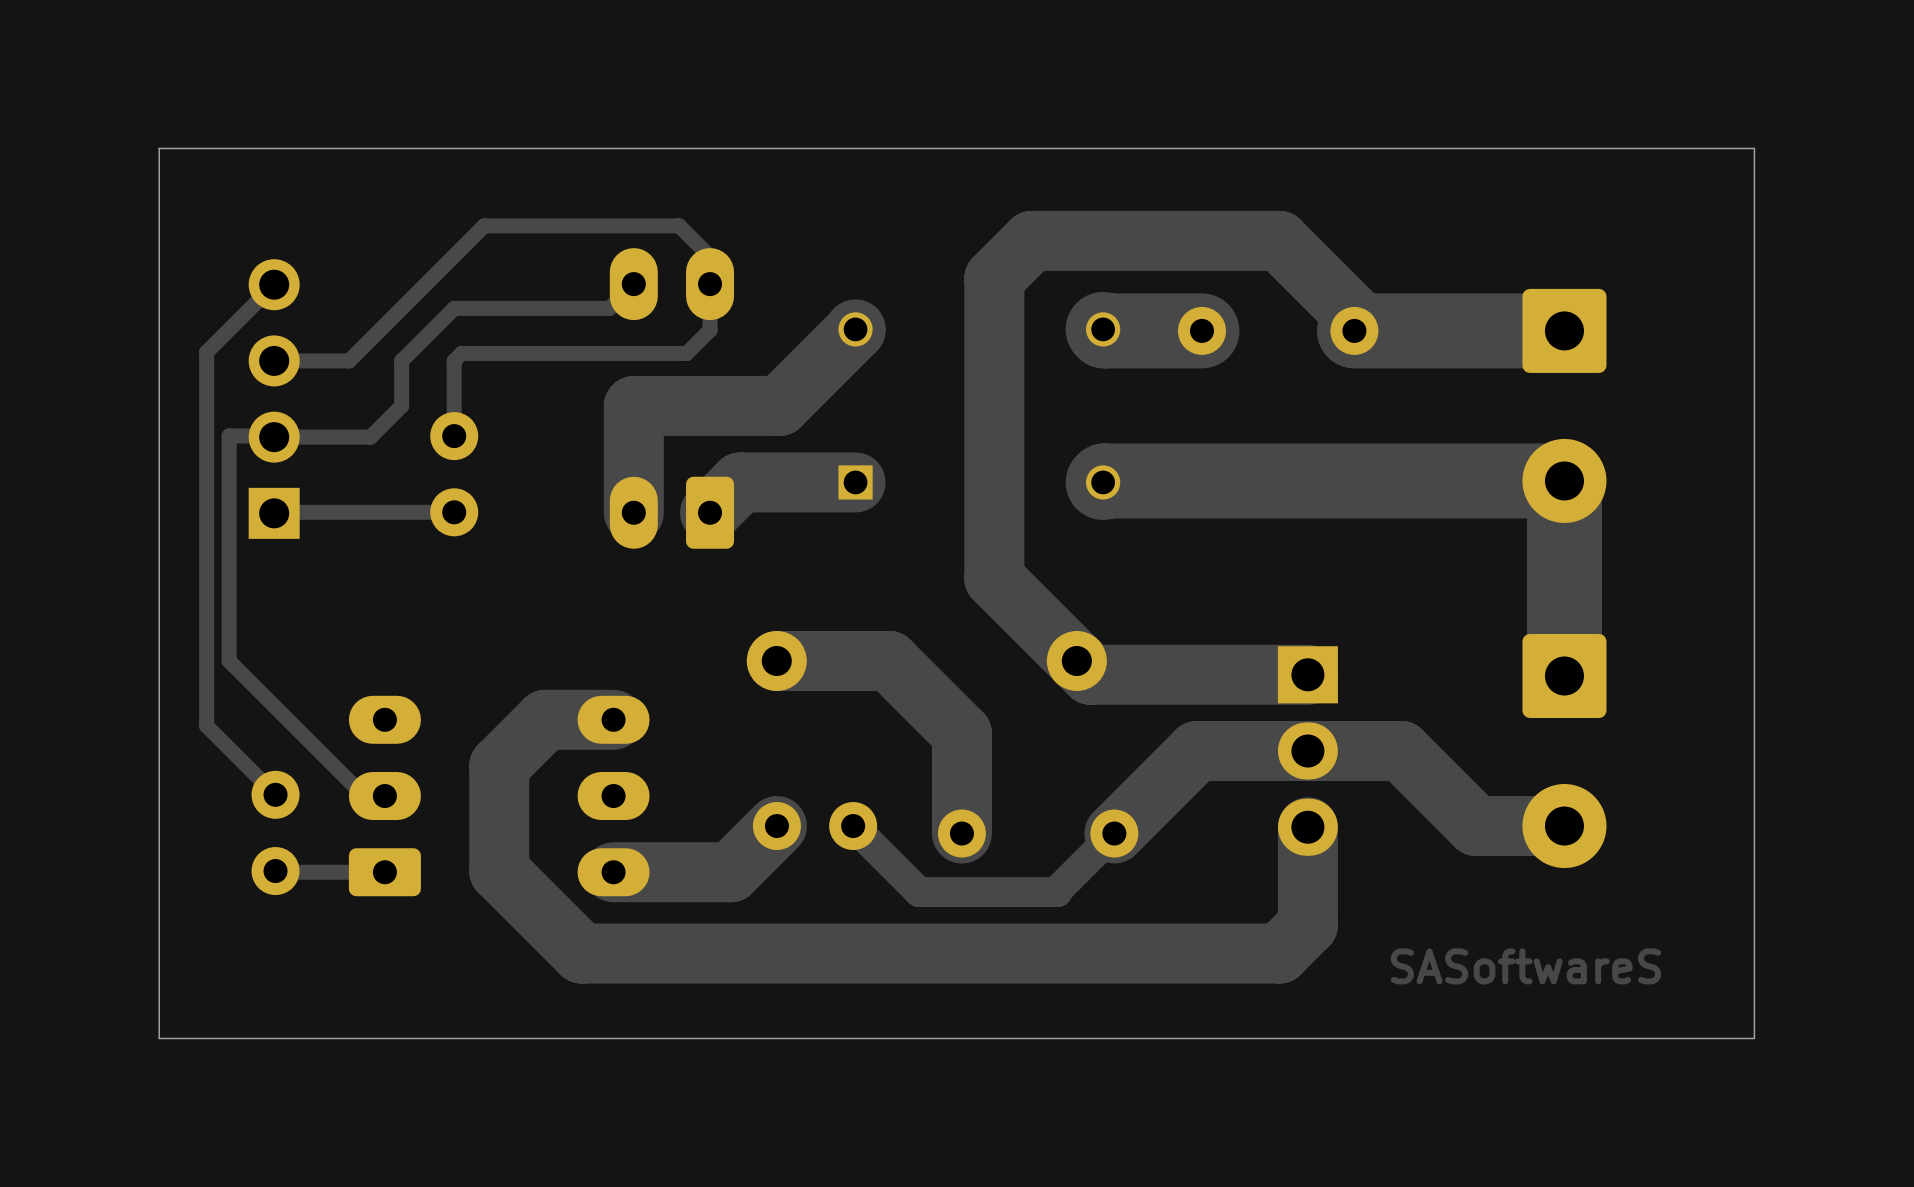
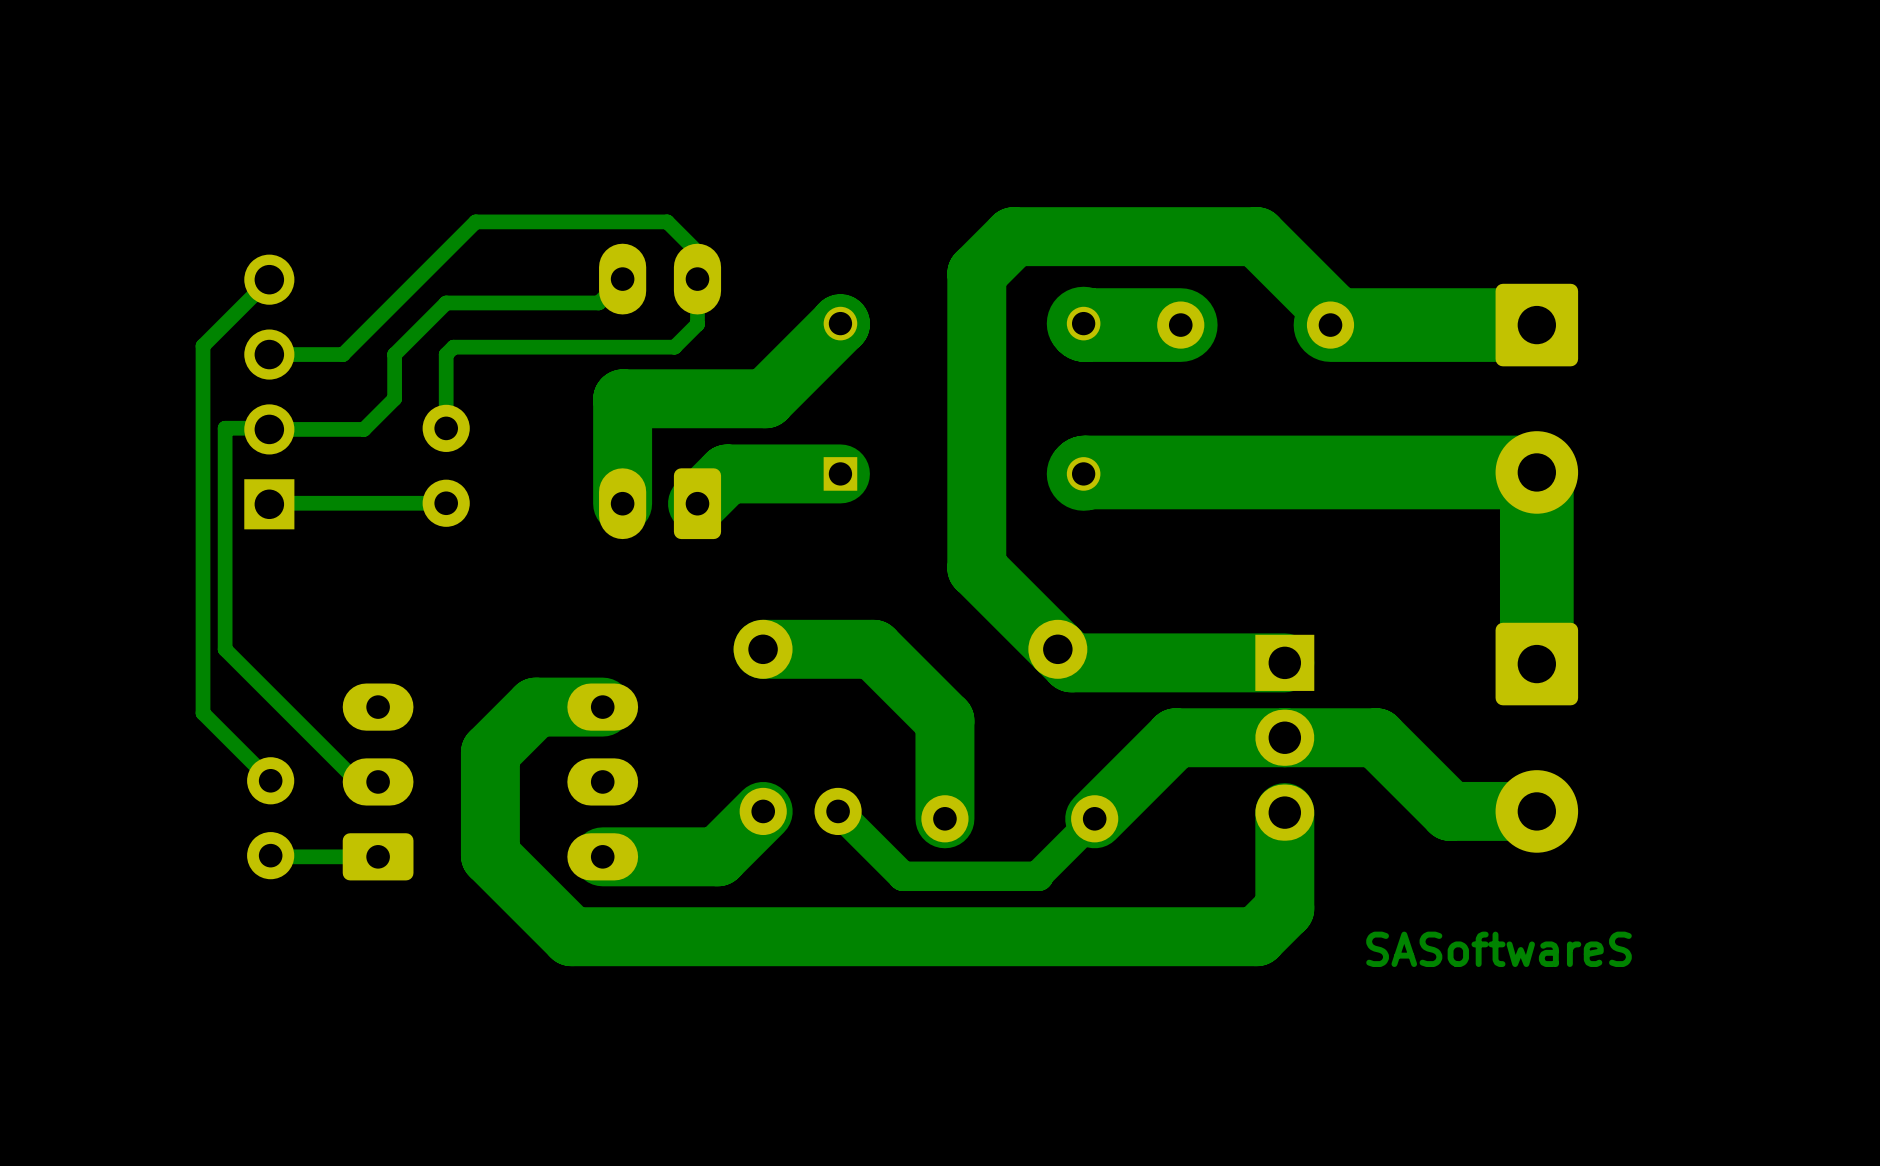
board edge: (1754, 148) (159, 148) (159, 1038) (1754, 1038) (1754, 148) -> none

